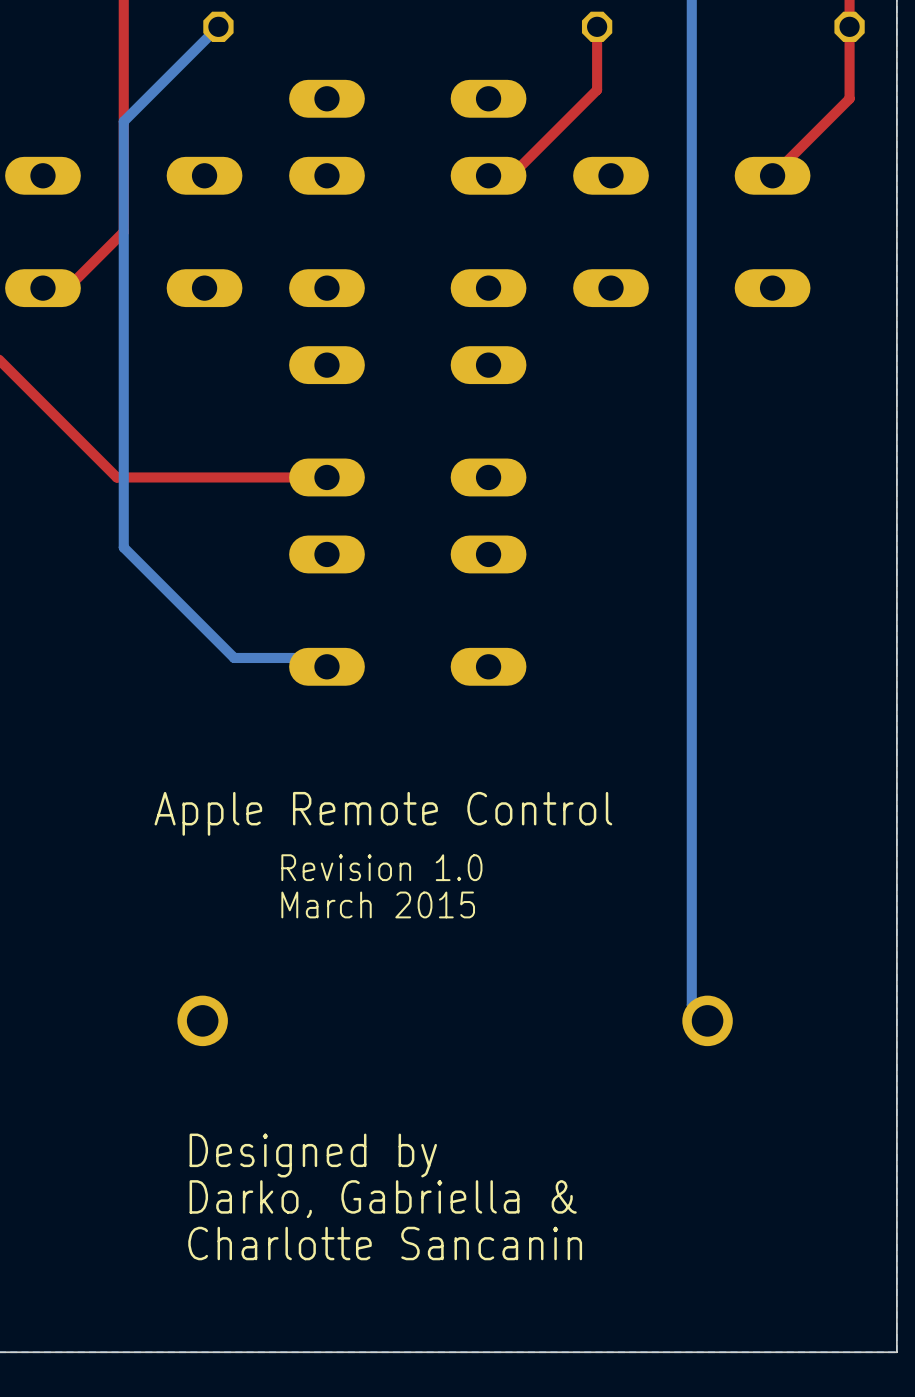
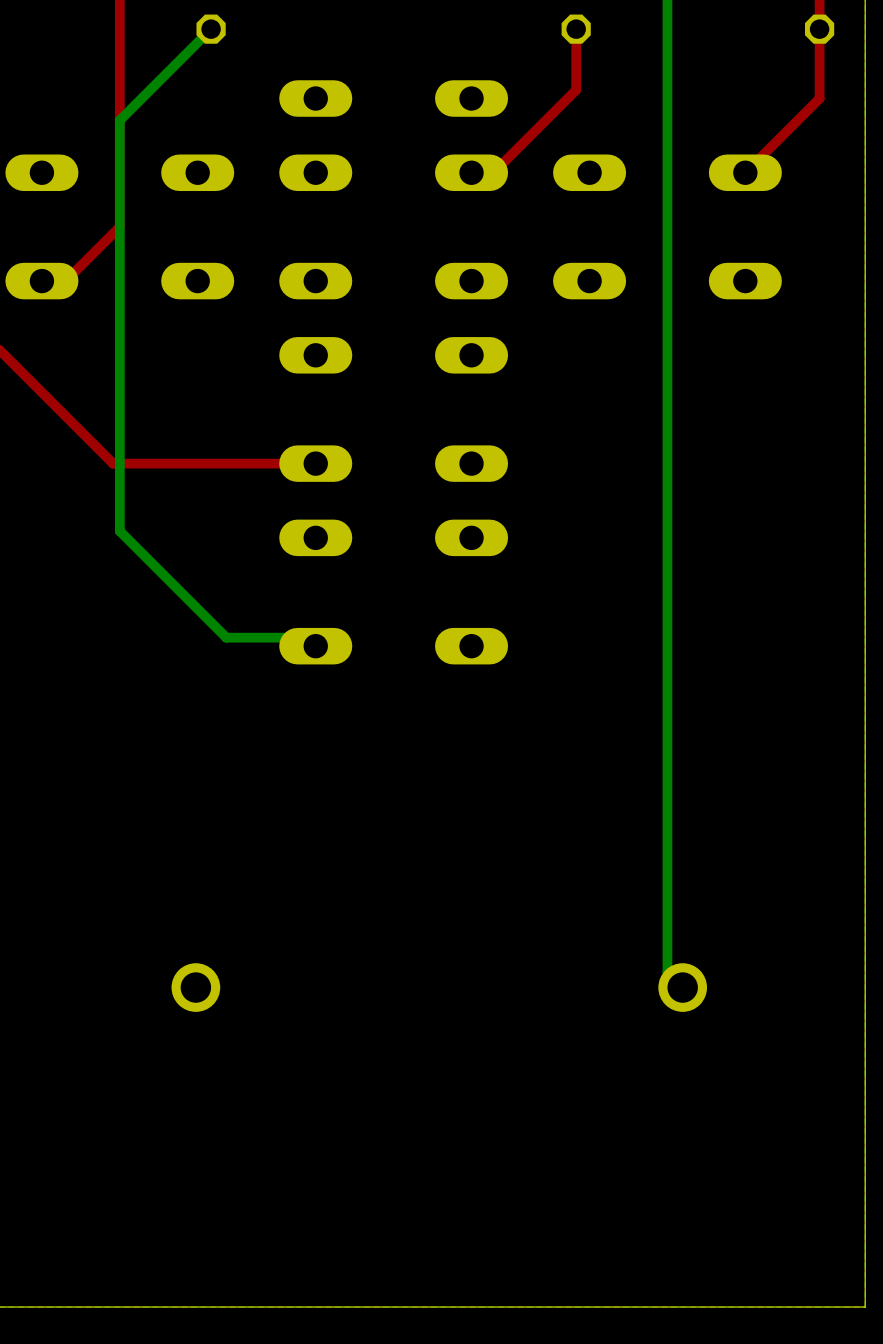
text: Apple Remote Control (383, 813) -> none
text: Revision 1.0 (381, 867) -> none
text: March 2015 (378, 904) -> none
text: Designed by (313, 1155) -> none
text: Darko, Gabriella & (383, 1199) -> none
text: Charlotte Sancanin (385, 1243) -> none

